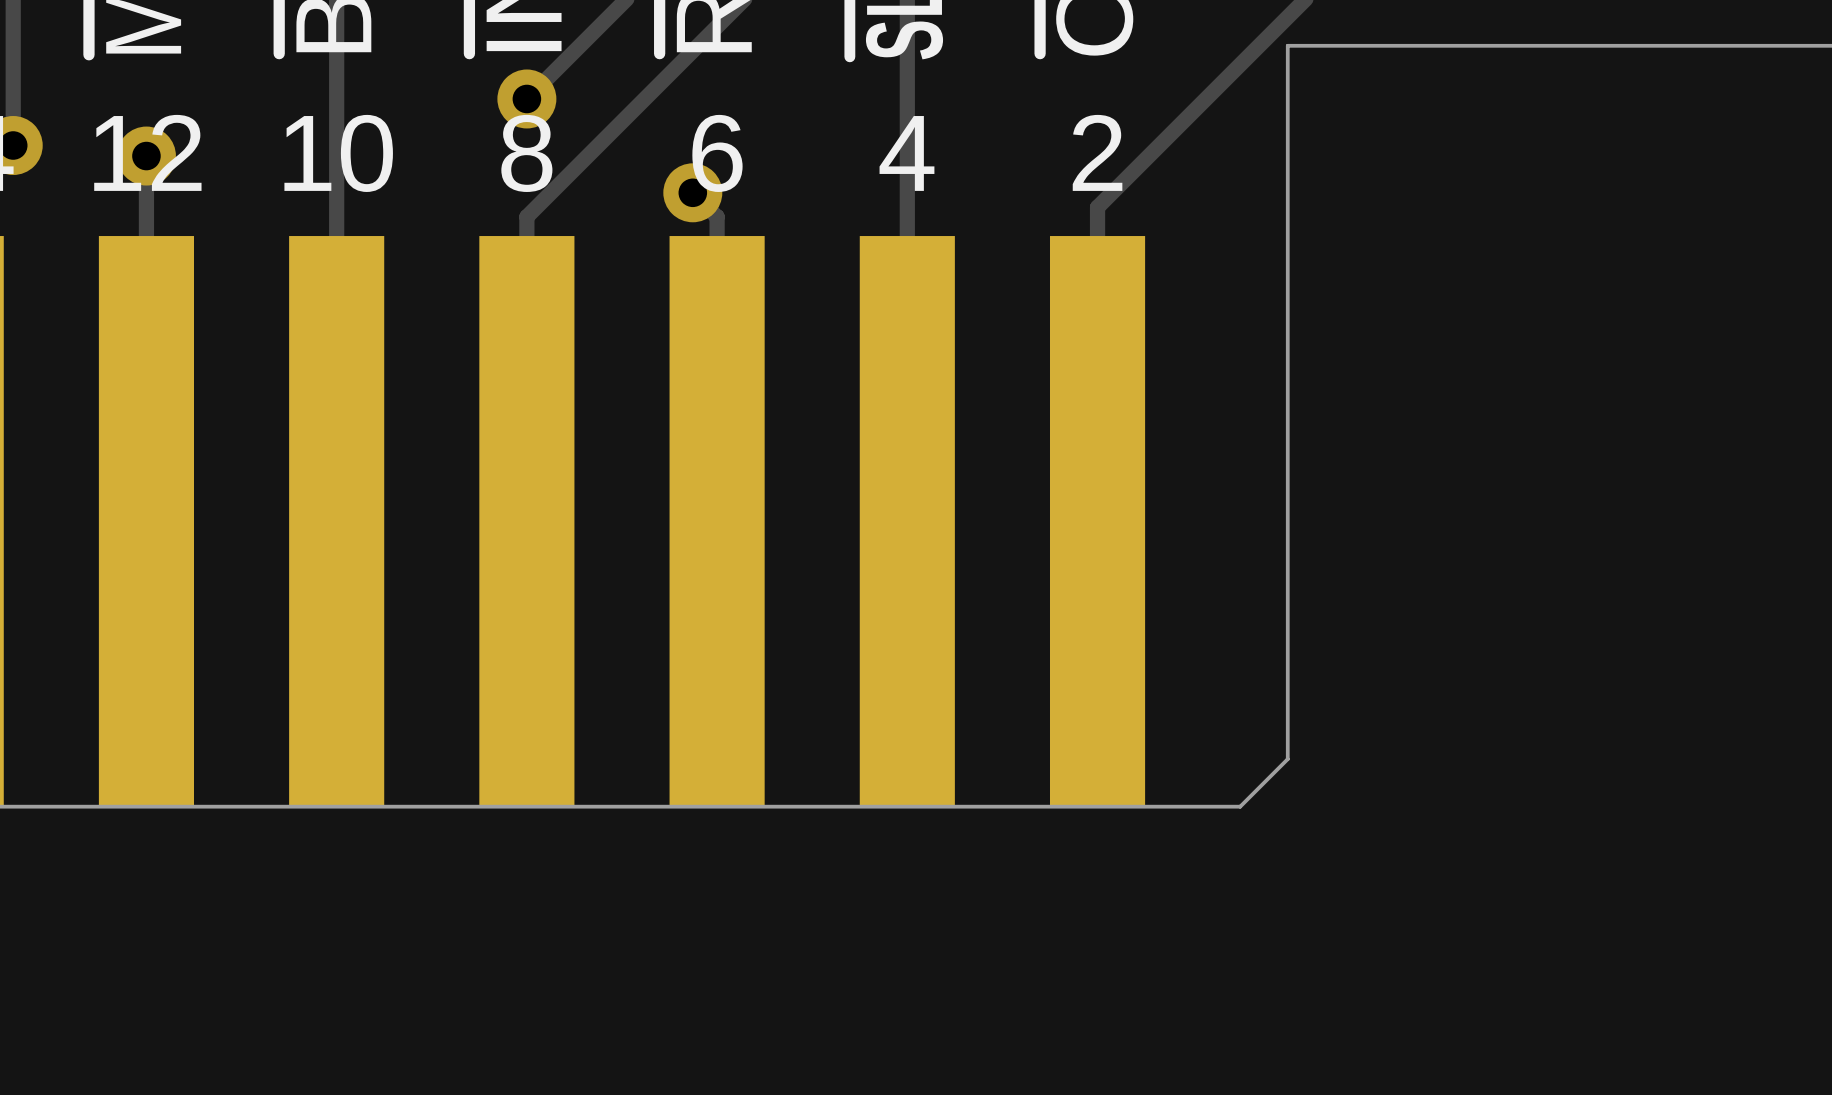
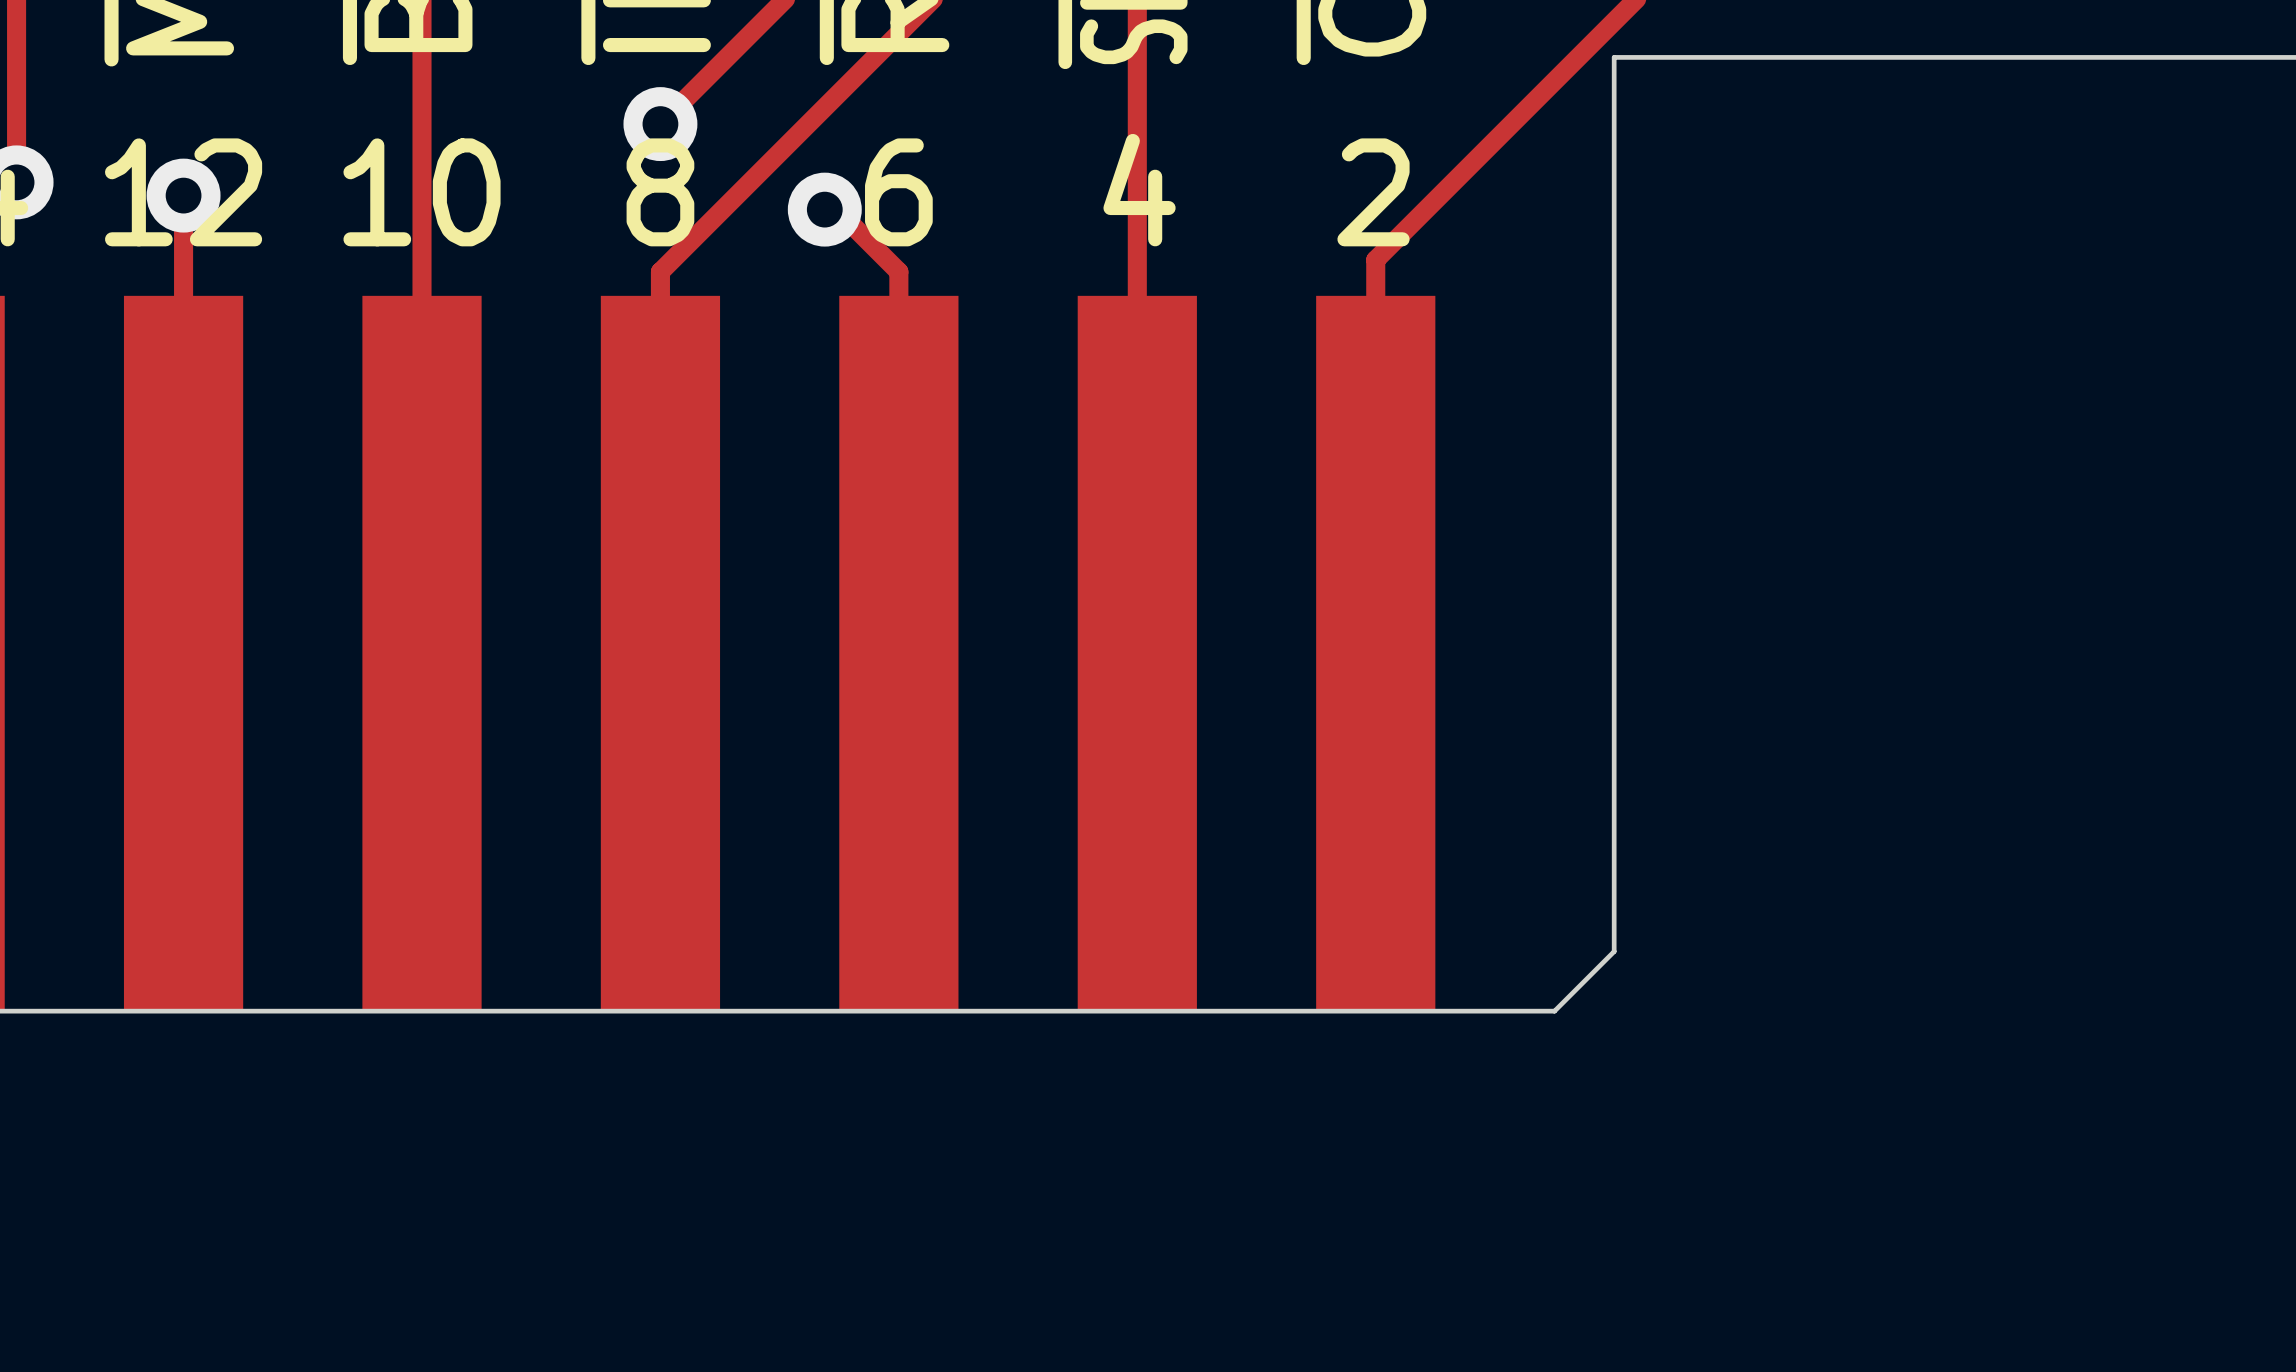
via position: (692, 192) -> (824, 209)

